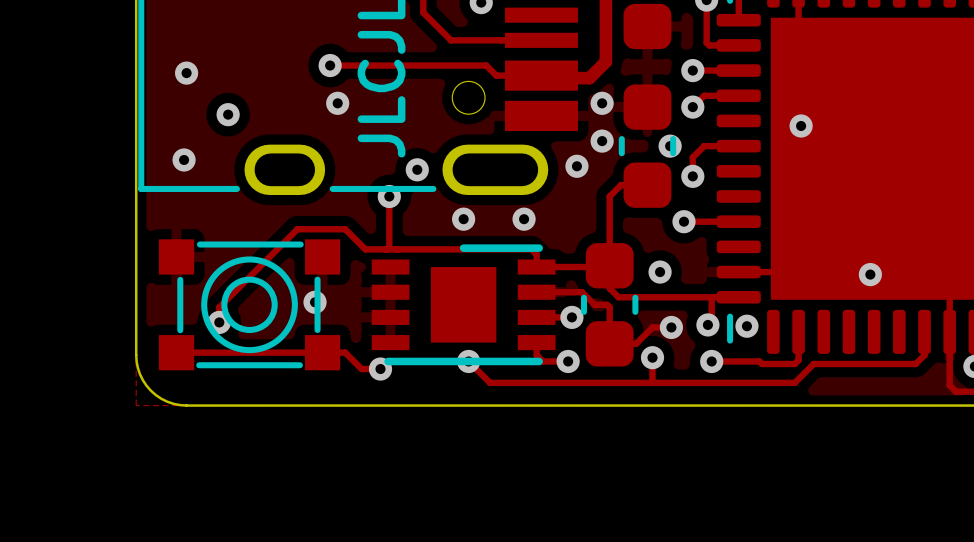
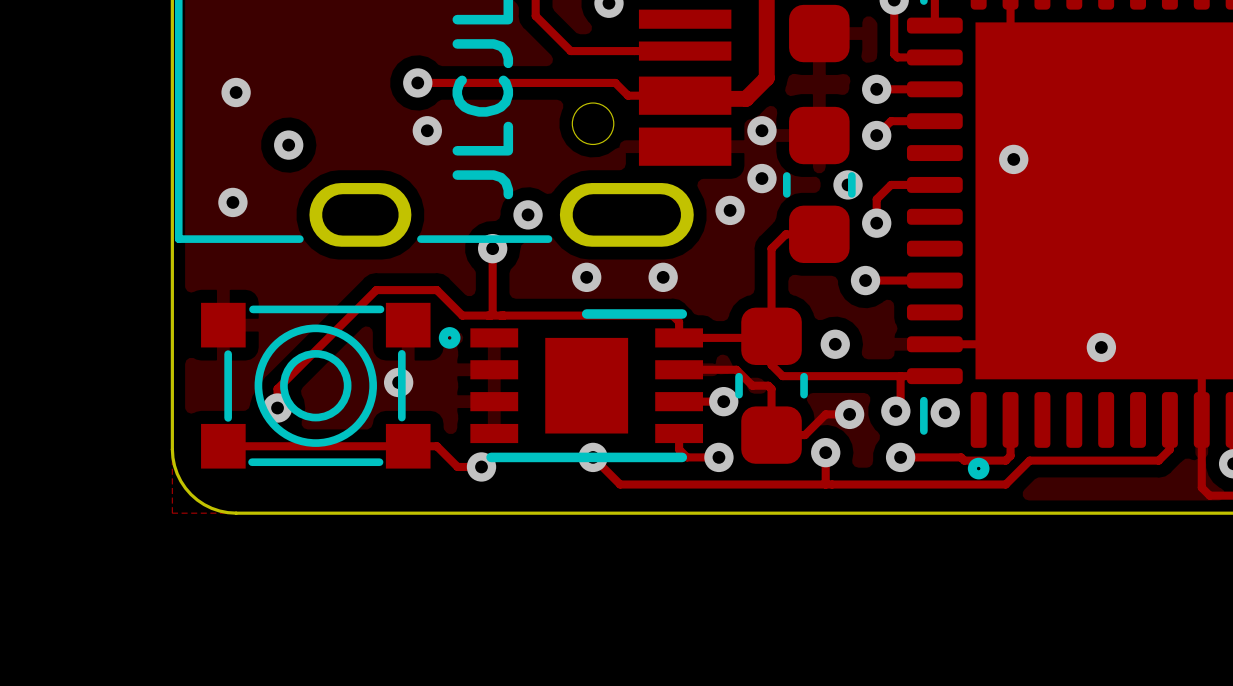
drawing: none -> [438, 327, 461, 349]
drawing: none -> [967, 457, 990, 480]

